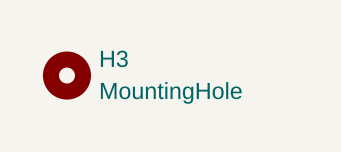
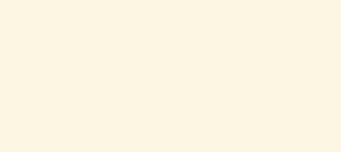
H3: MountingHole (66, 75) -> none

